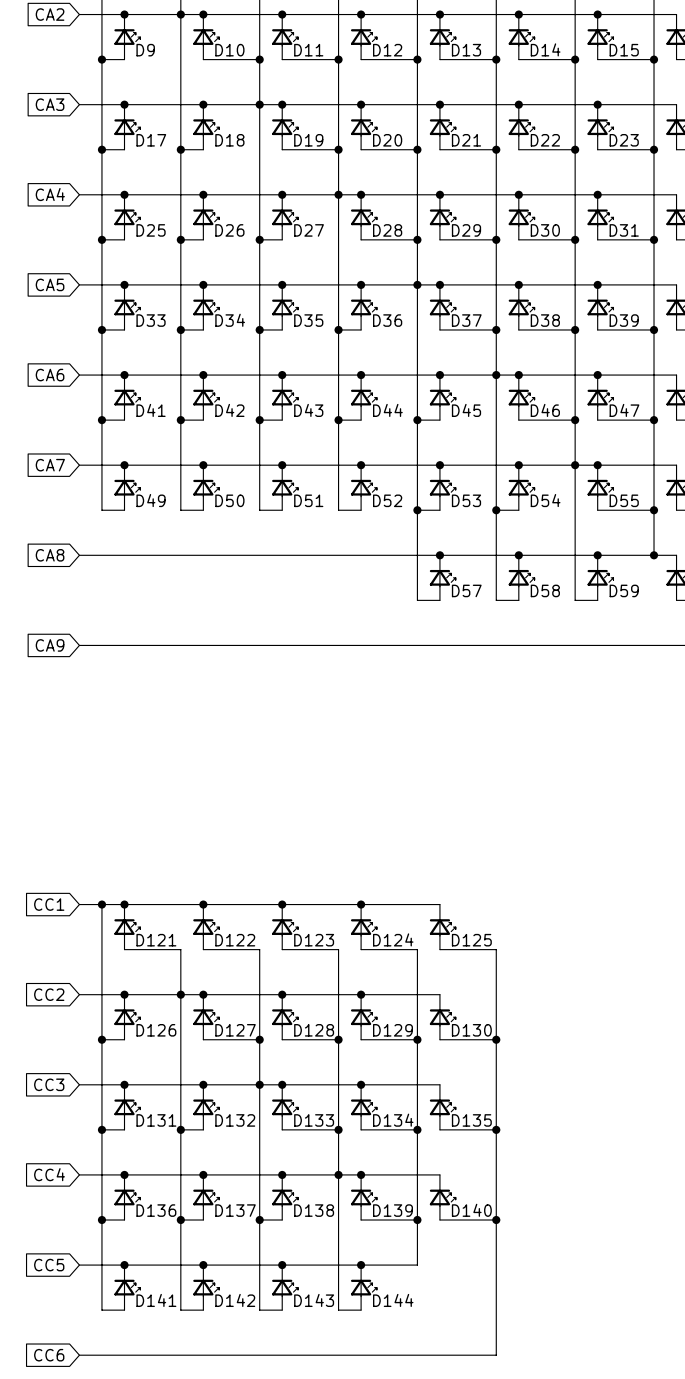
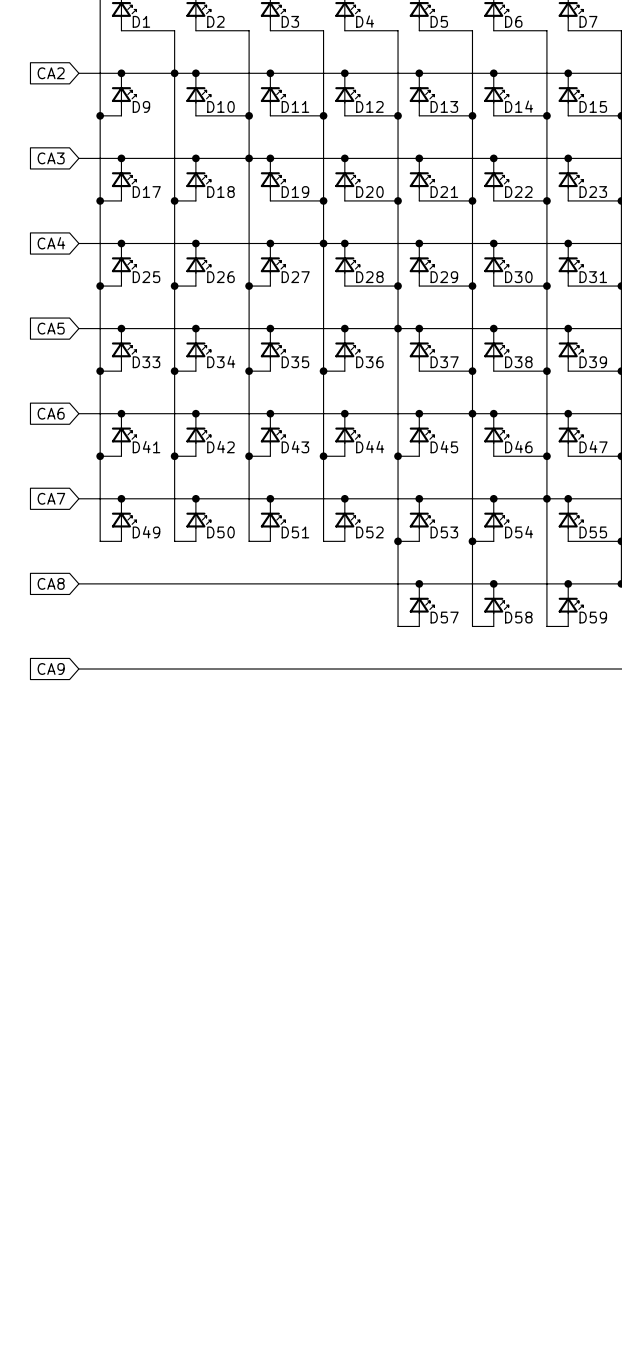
global label: CC1 (49, 904) -> none
wire: (79, 904) (439, 904) -> none
wire: (101, 904) (101, 1310) (124, 1310) -> none
junction: (101, 904) -> none
junction: (124, 904) -> none
junction: (203, 904) -> none
junction: (282, 904) -> none
junction: (361, 904) -> none
D121: (127, 927) -> none
D122: (206, 927) -> none
D123: (285, 927) -> none
D124: (363, 927) -> none
D125: (442, 927) -> none
wire: (124, 949) (180, 949) (180, 1310) (203, 1310) -> none
wire: (203, 949) (259, 949) (259, 1310) (282, 1310) -> none
wire: (282, 949) (338, 949) (338, 1310) (361, 1310) -> none
wire: (361, 949) (417, 949) (417, 1265) (79, 1265) -> none
wire: (439, 949) (496, 949) (496, 1355) (79, 1355) -> none
global label: CC2 (49, 994) -> none
wire: (79, 994) (439, 994) -> none
junction: (124, 994) -> none
junction: (180, 994) -> none
junction: (203, 994) -> none
junction: (282, 994) -> none
junction: (361, 994) -> none
D126: (127, 1017) -> none
D127: (206, 1017) -> none
D128: (285, 1017) -> none
D129: (363, 1017) -> none
D130: (442, 1017) -> none
wire: (101, 1039) (124, 1039) -> none
junction: (101, 1039) -> none
wire: (203, 1039) (259, 1039) -> none
junction: (259, 1039) -> none
wire: (282, 1039) (338, 1039) -> none
junction: (338, 1039) -> none
wire: (361, 1039) (417, 1039) -> none
junction: (417, 1039) -> none
wire: (439, 1039) (496, 1039) -> none
junction: (496, 1039) -> none
global label: CC3 (49, 1084) -> none
wire: (79, 1084) (439, 1084) -> none
junction: (124, 1084) -> none
junction: (203, 1084) -> none
junction: (259, 1084) -> none
junction: (282, 1084) -> none
junction: (361, 1084) -> none
D131: (127, 1107) -> none
D132: (206, 1107) -> none
D133: (285, 1107) -> none
D134: (363, 1107) -> none
D135: (442, 1107) -> none
wire: (101, 1129) (124, 1129) -> none
junction: (101, 1129) -> none
wire: (180, 1129) (203, 1129) -> none
junction: (180, 1129) -> none
wire: (282, 1129) (338, 1129) -> none
junction: (338, 1129) -> none
wire: (361, 1129) (417, 1129) -> none
junction: (417, 1129) -> none
wire: (439, 1129) (496, 1129) -> none
junction: (496, 1129) -> none
global label: CC4 (49, 1174) -> none
wire: (79, 1174) (439, 1174) -> none
junction: (124, 1174) -> none
junction: (203, 1174) -> none
junction: (282, 1174) -> none
junction: (338, 1174) -> none
junction: (361, 1174) -> none
D136: (127, 1197) -> none
D137: (206, 1197) -> none
D138: (285, 1197) -> none
D139: (363, 1197) -> none
D140: (442, 1197) -> none
wire: (101, 1220) (124, 1220) -> none
junction: (101, 1220) -> none
wire: (180, 1220) (203, 1220) -> none
junction: (180, 1220) -> none
wire: (259, 1220) (282, 1220) -> none
junction: (259, 1220) -> none
wire: (361, 1220) (417, 1220) -> none
junction: (417, 1220) -> none
wire: (439, 1220) (496, 1220) -> none
junction: (496, 1220) -> none
global label: CC5 (49, 1265) -> none
junction: (124, 1265) -> none
junction: (203, 1265) -> none
junction: (282, 1265) -> none
junction: (361, 1265) -> none
D141: (127, 1287) -> none
D142: (206, 1287) -> none
D143: (285, 1287) -> none
D144: (363, 1287) -> none
global label: CC6 (49, 1355) -> none

